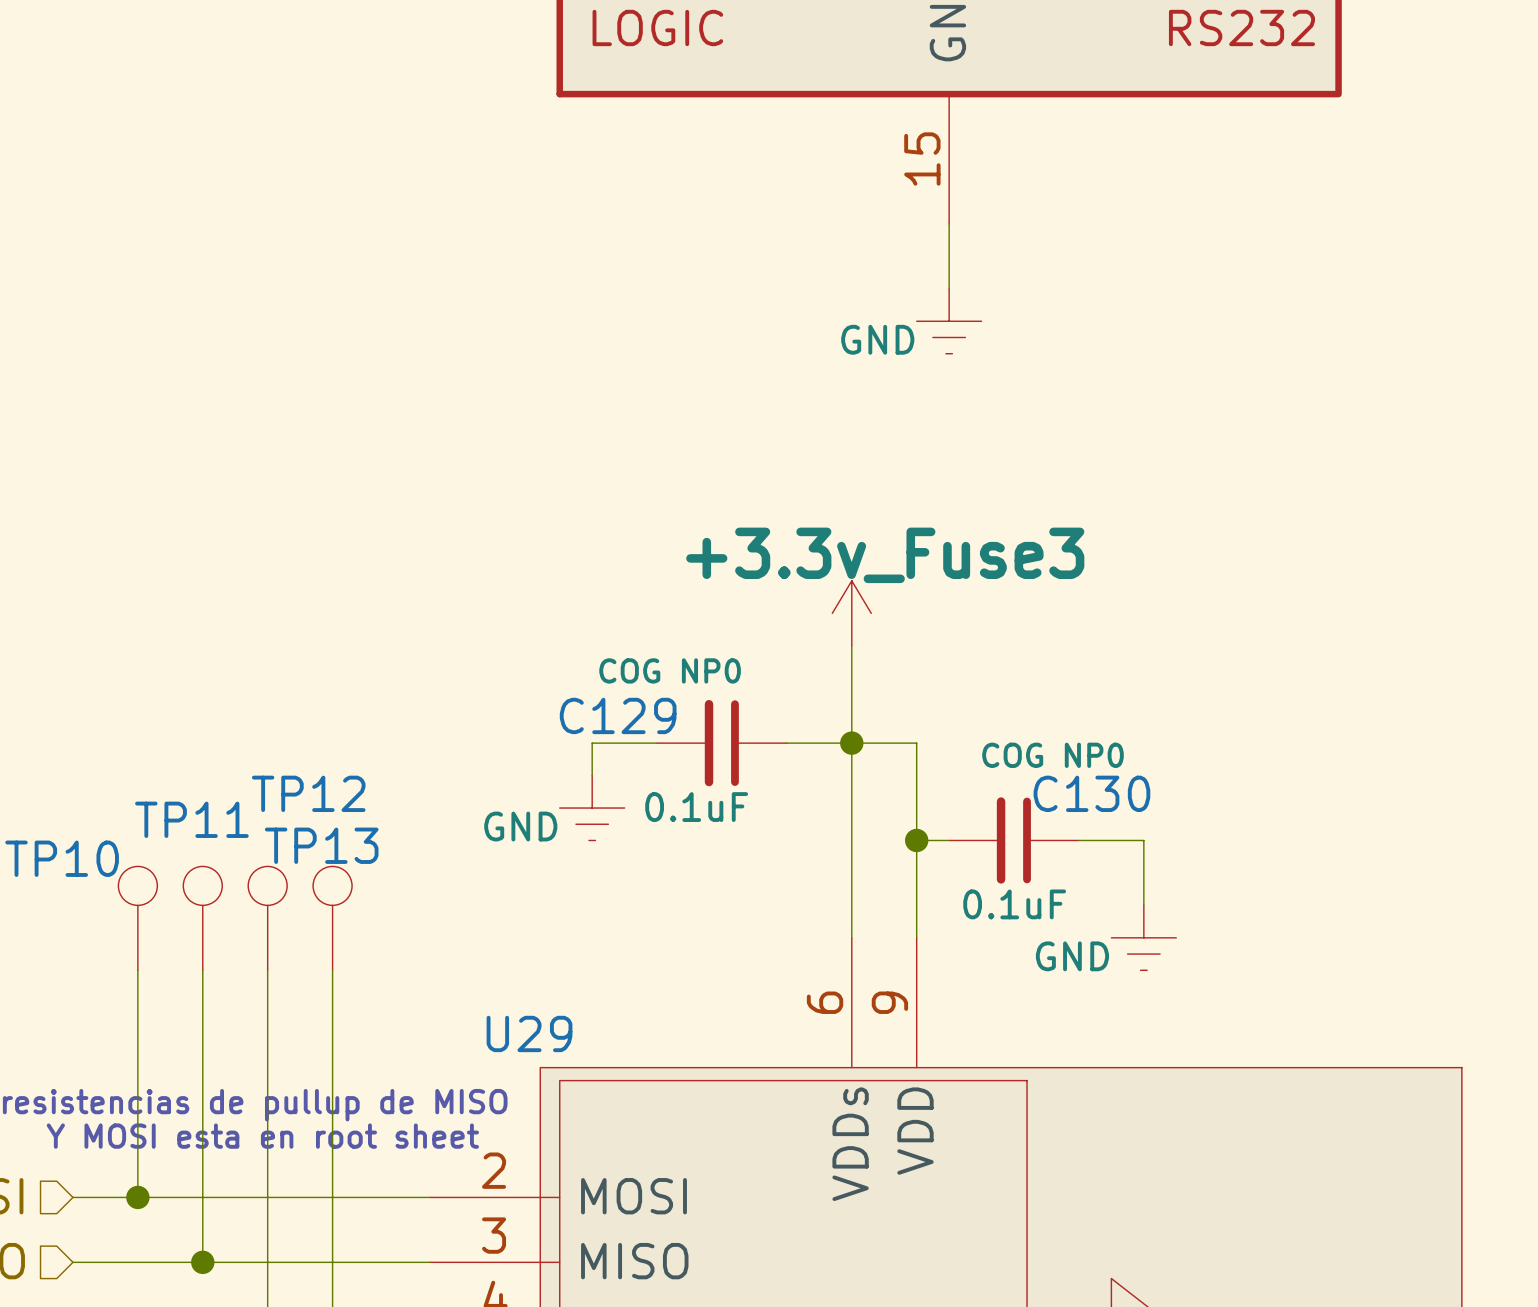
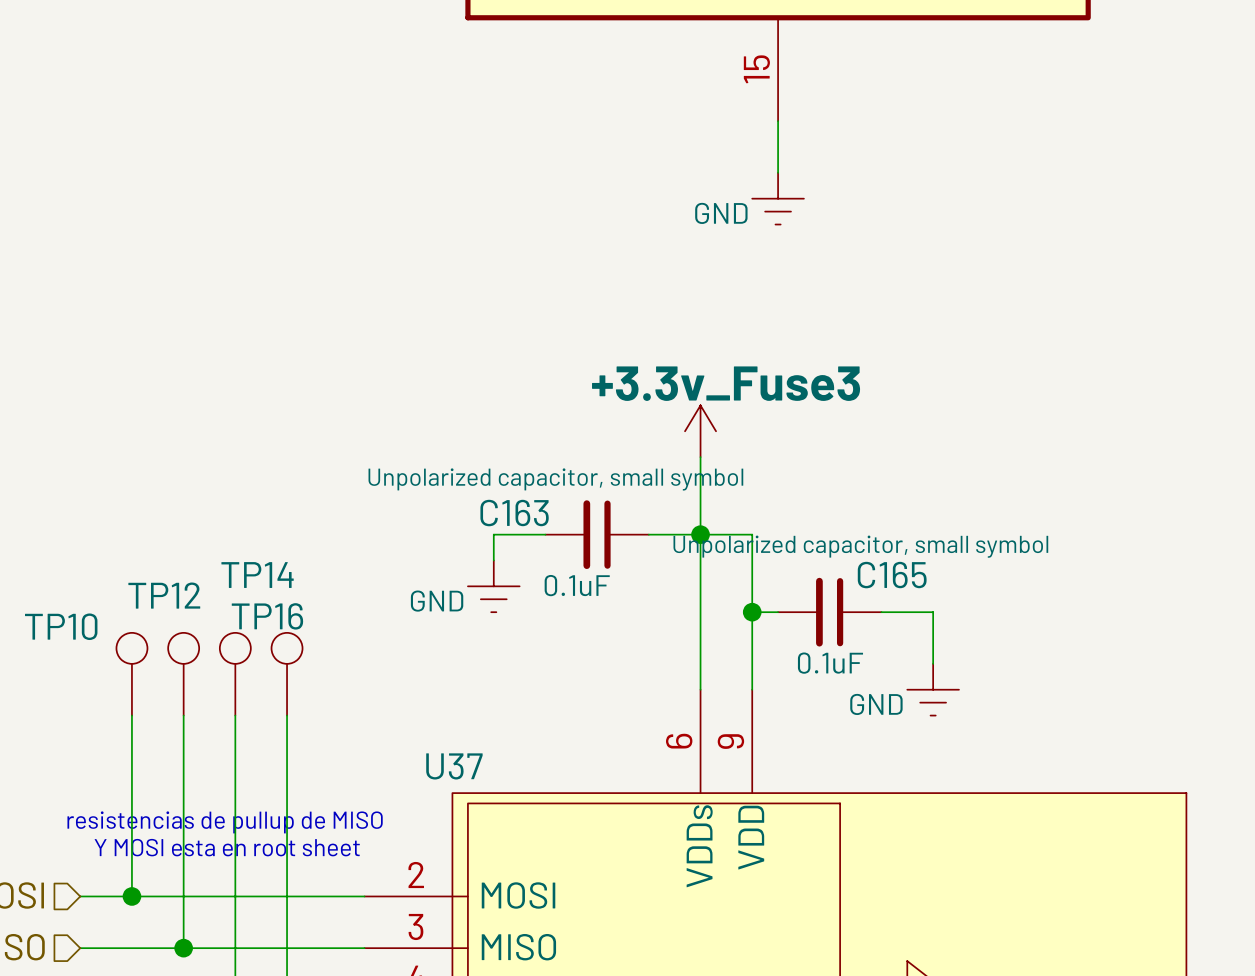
C129 text: COG NP0 (670, 670) -> Unpolarized capacitor, small symbol (555, 479)
C129 name: C129 (618, 715) -> C163 (514, 513)
C130 text: COG NP0 (1052, 755) -> Unpolarized capacitor, small symbol (860, 546)
TP12 name: TP12 (308, 793) -> TP14 (257, 575)
C130 name: C130 (1091, 793) -> C165 (892, 575)
TP11 name: TP11 (191, 819) -> TP12 (164, 595)
TP13 name: TP13 (321, 845) -> TP16 (267, 616)
U29 name: U29 (529, 1033) -> U37 (454, 766)

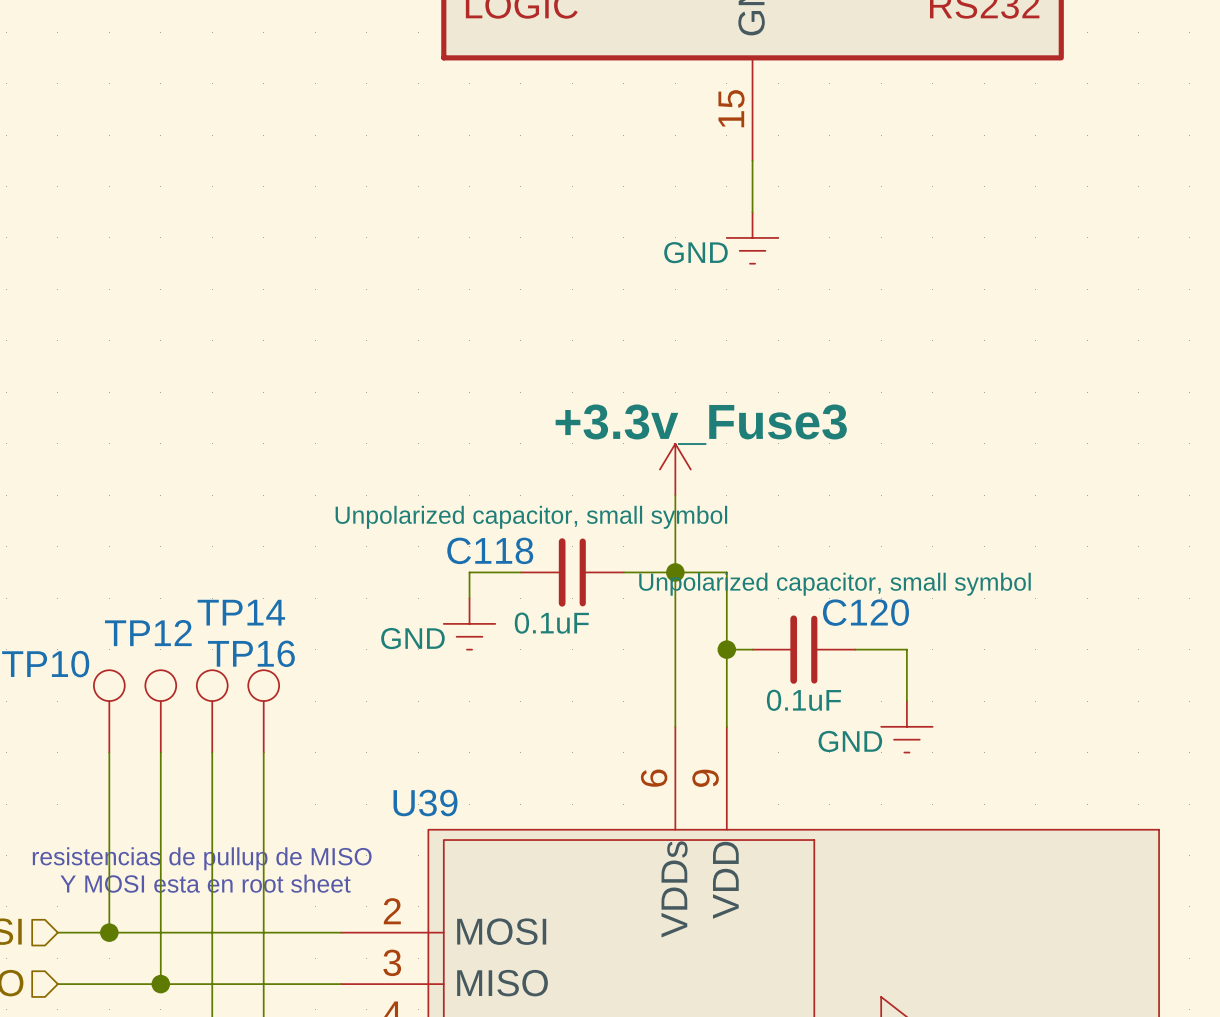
C163 name: C163 (514, 513) -> C118 (490, 550)
C165 name: C165 (892, 575) -> C120 (865, 612)
U37 name: U37 (454, 766) -> U39 (425, 803)

